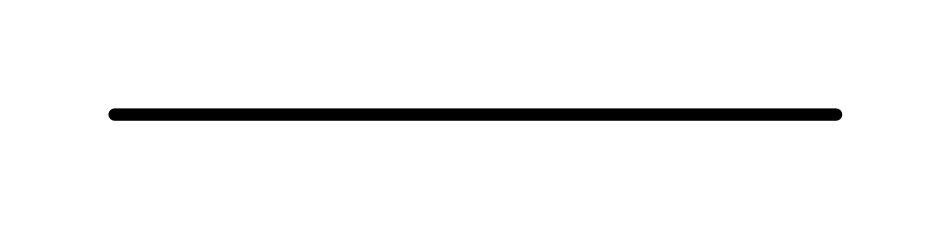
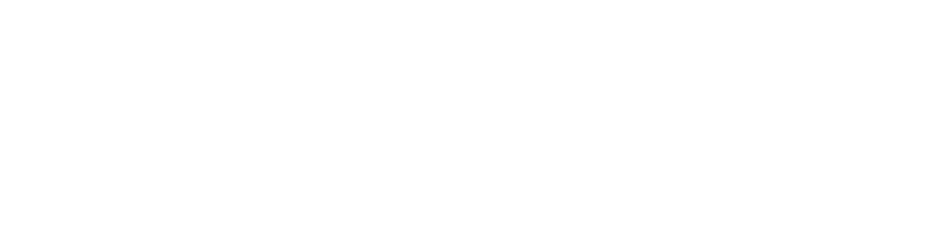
line: (114, 114) (836, 114) -> none

